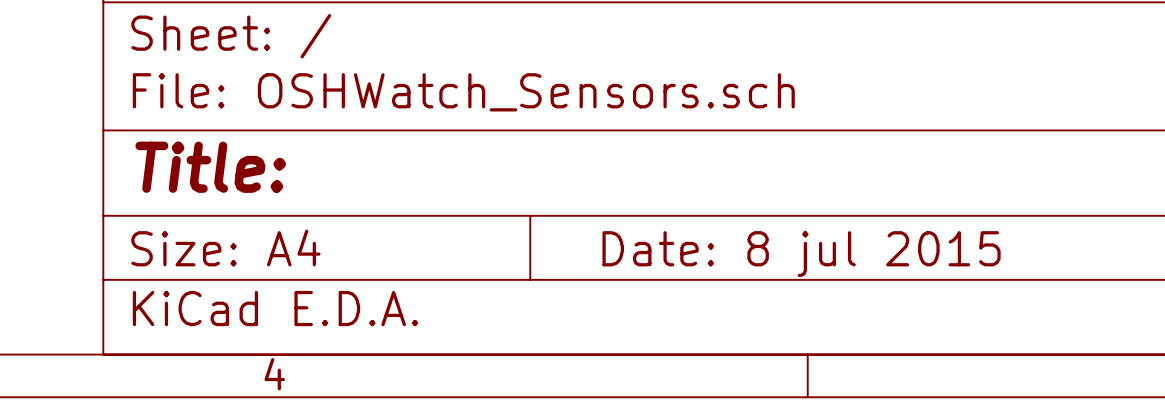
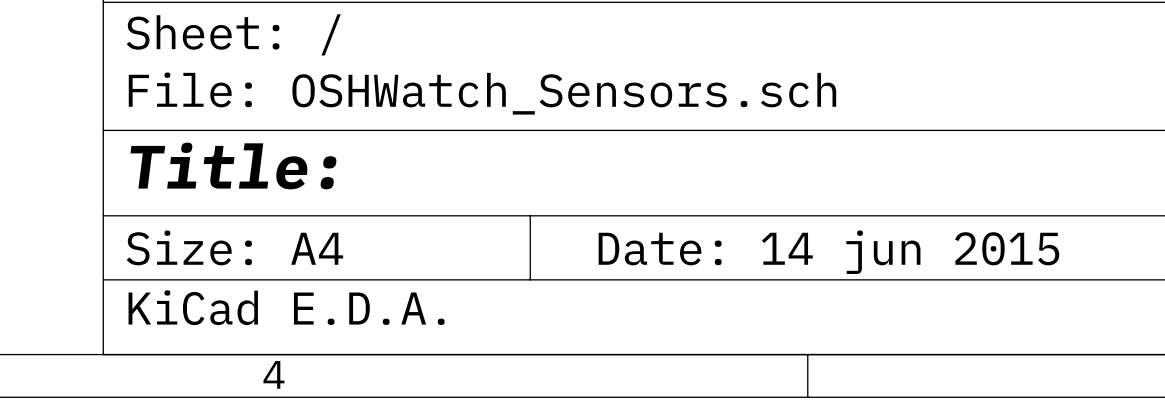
title block: Date: 8 jul 2015 (801, 254) -> Date: 14 jun 2015 (828, 252)

